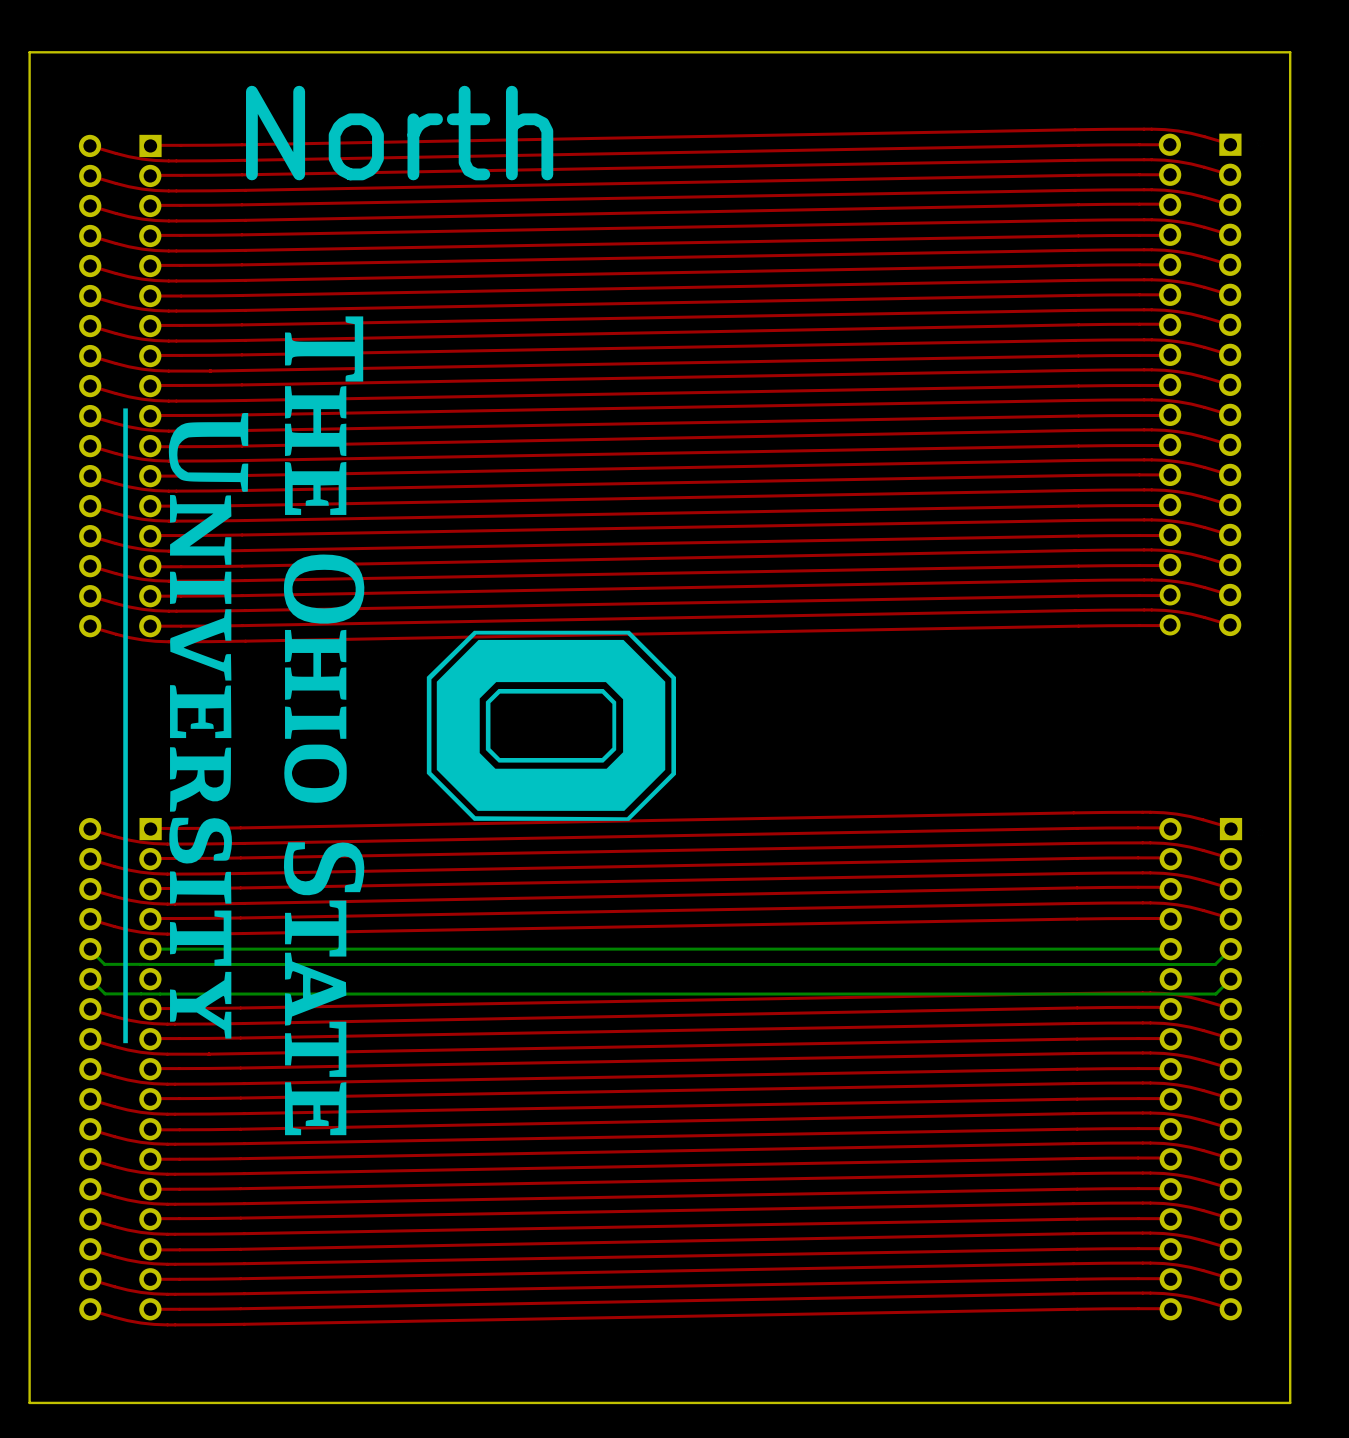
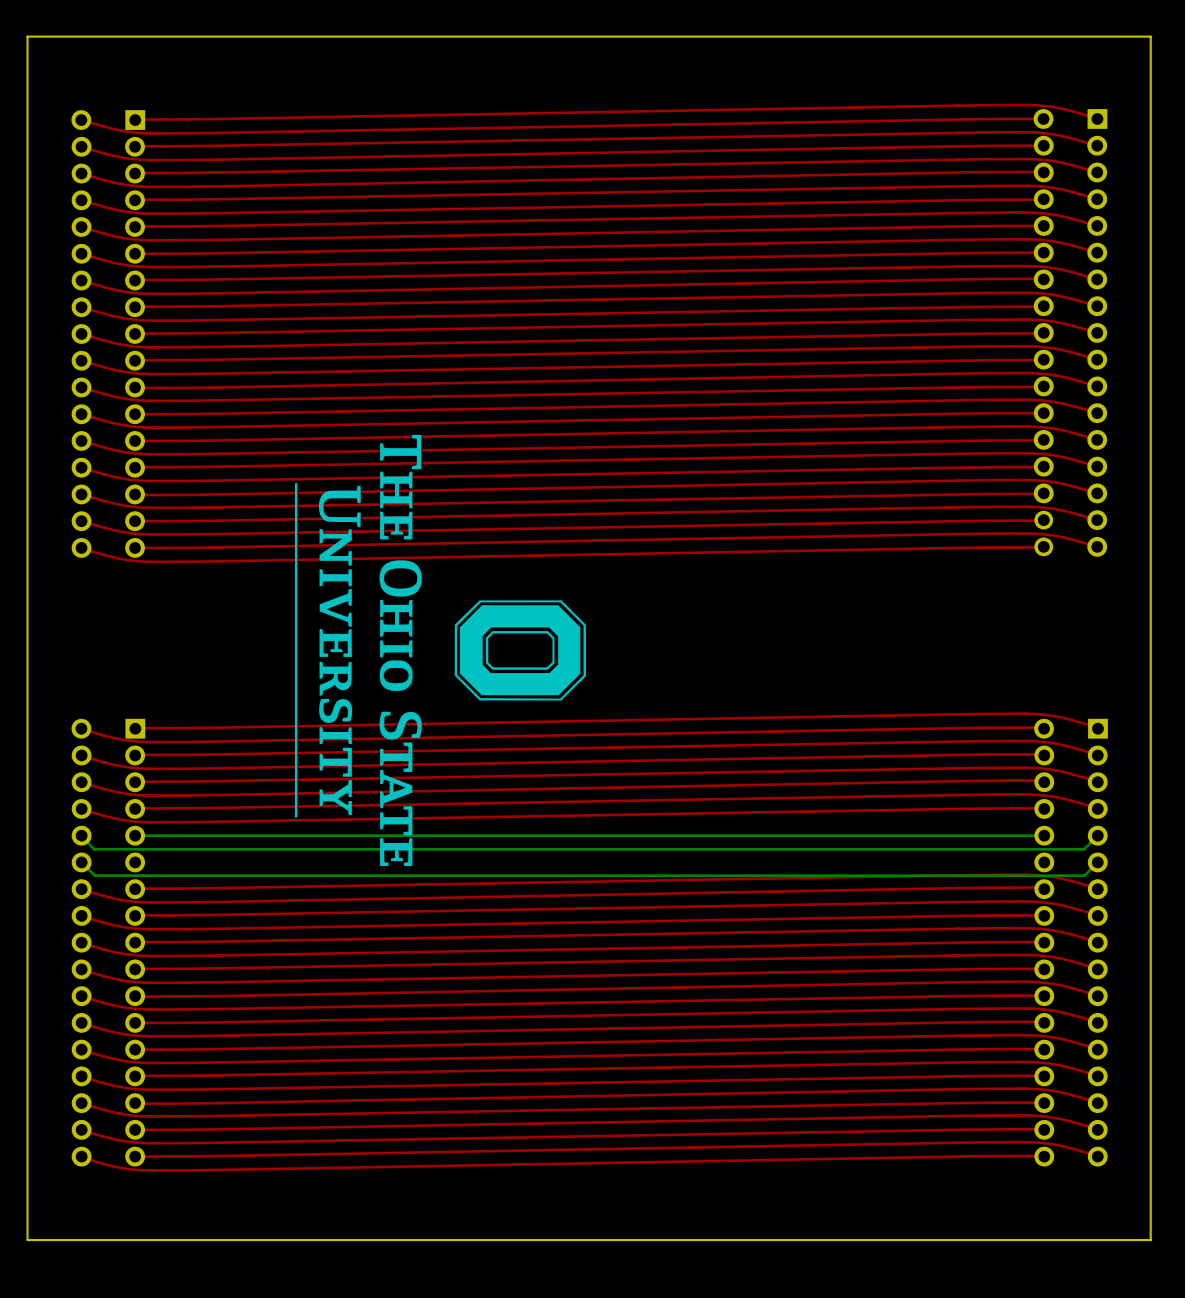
text: North (399, 133) -> none
drawing: [123, 316, 676, 1136] -> none
drawing: none -> [294, 434, 586, 866]

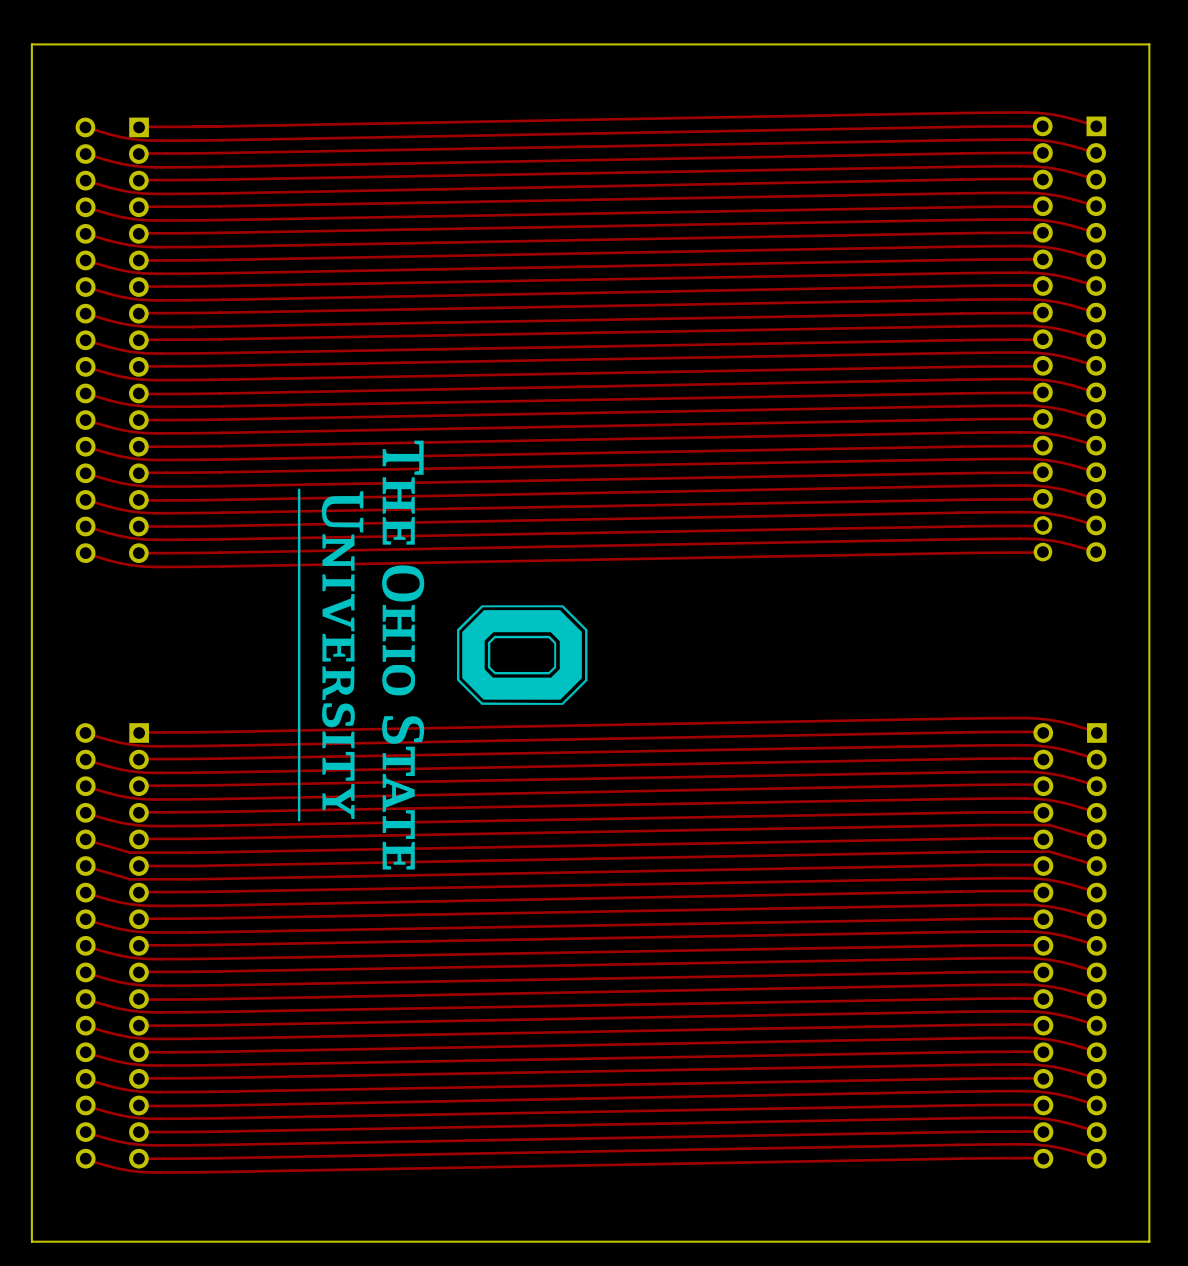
top track: none -> (1041, 838) (191, 852) (130, 852) (84, 839)
top track: none -> (1094, 838) (1049, 825) (988, 825) (137, 838)
bottom track: (1044, 835) (135, 835) -> none
bottom track: (1097, 836) (1084, 849) (94, 849) (81, 836) -> none
top track: none -> (1041, 864) (191, 879) (130, 879) (84, 866)
top track: none -> (1095, 864) (1049, 851) (988, 851) (137, 866)
bottom track: (1097, 862) (1084, 875) (94, 875) (81, 862) -> none

